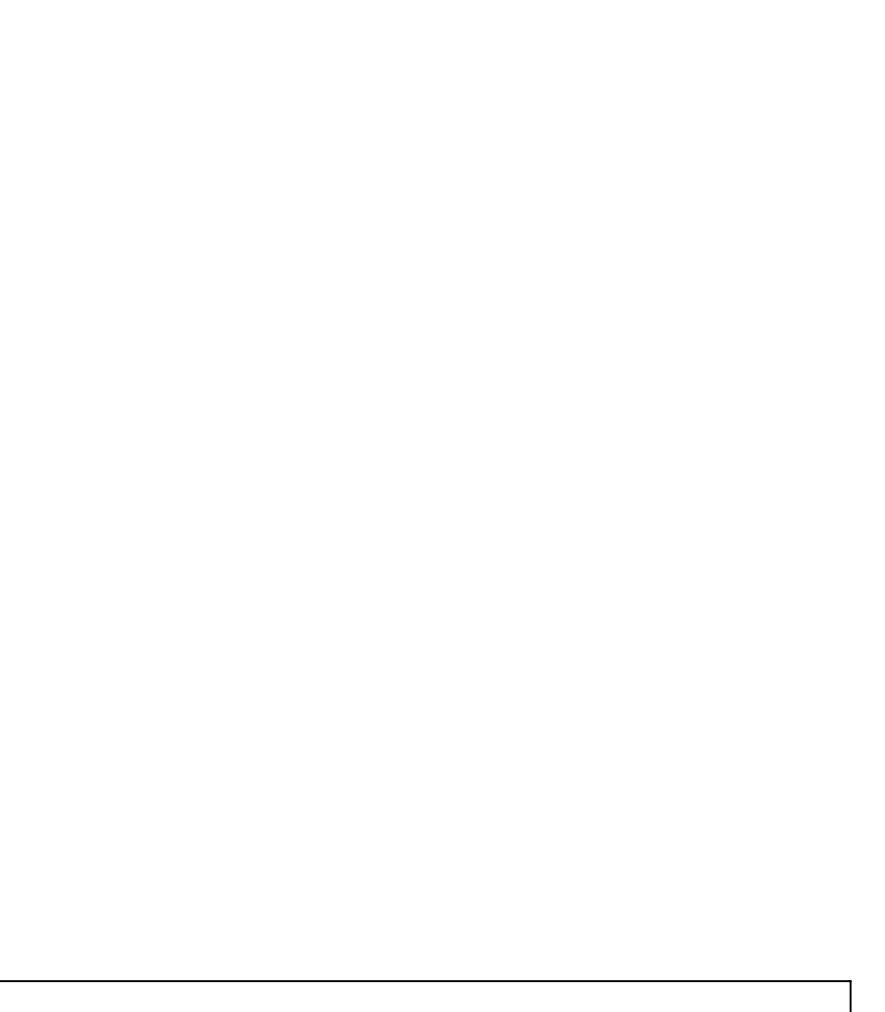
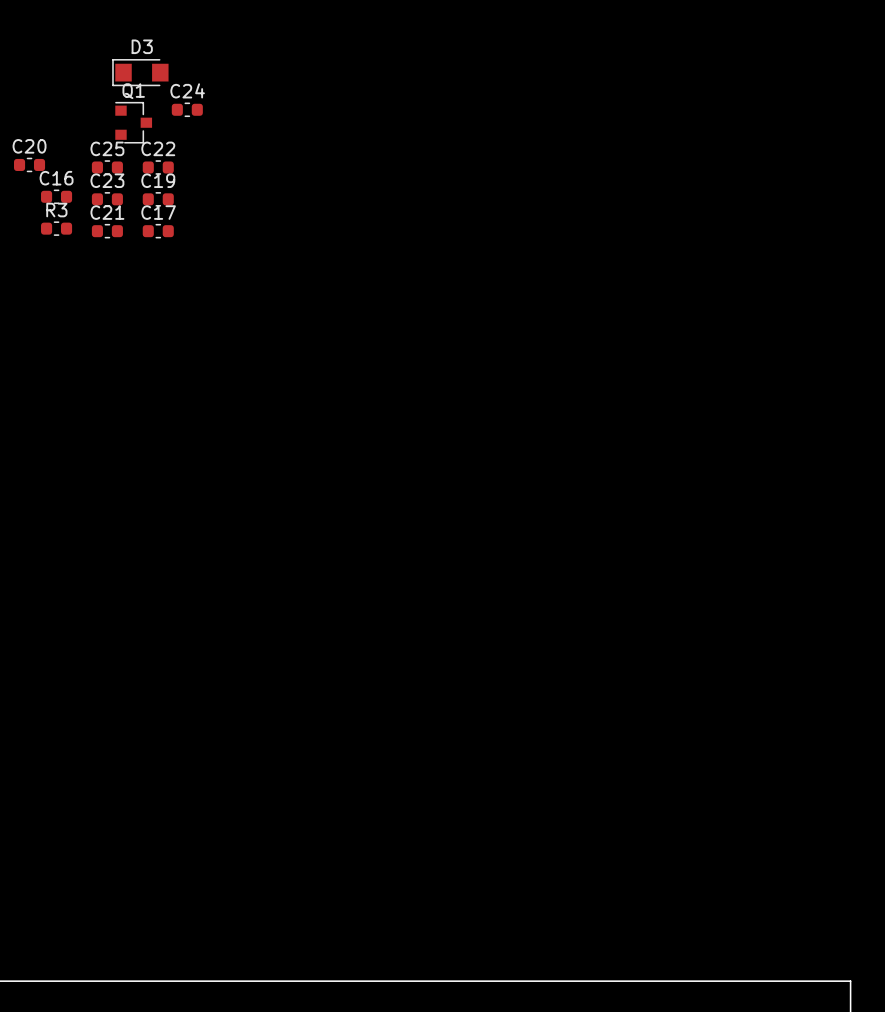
D3: none -> (140, 72)
C24: none -> (187, 109)
Q1: none -> (133, 122)
C20: none -> (29, 164)
C25: none -> (107, 167)
C22: none -> (158, 167)
C16: none -> (56, 196)
C23: none -> (107, 199)
C19: none -> (158, 199)
R3: none -> (56, 228)
C21: none -> (107, 231)
C17: none -> (158, 231)

